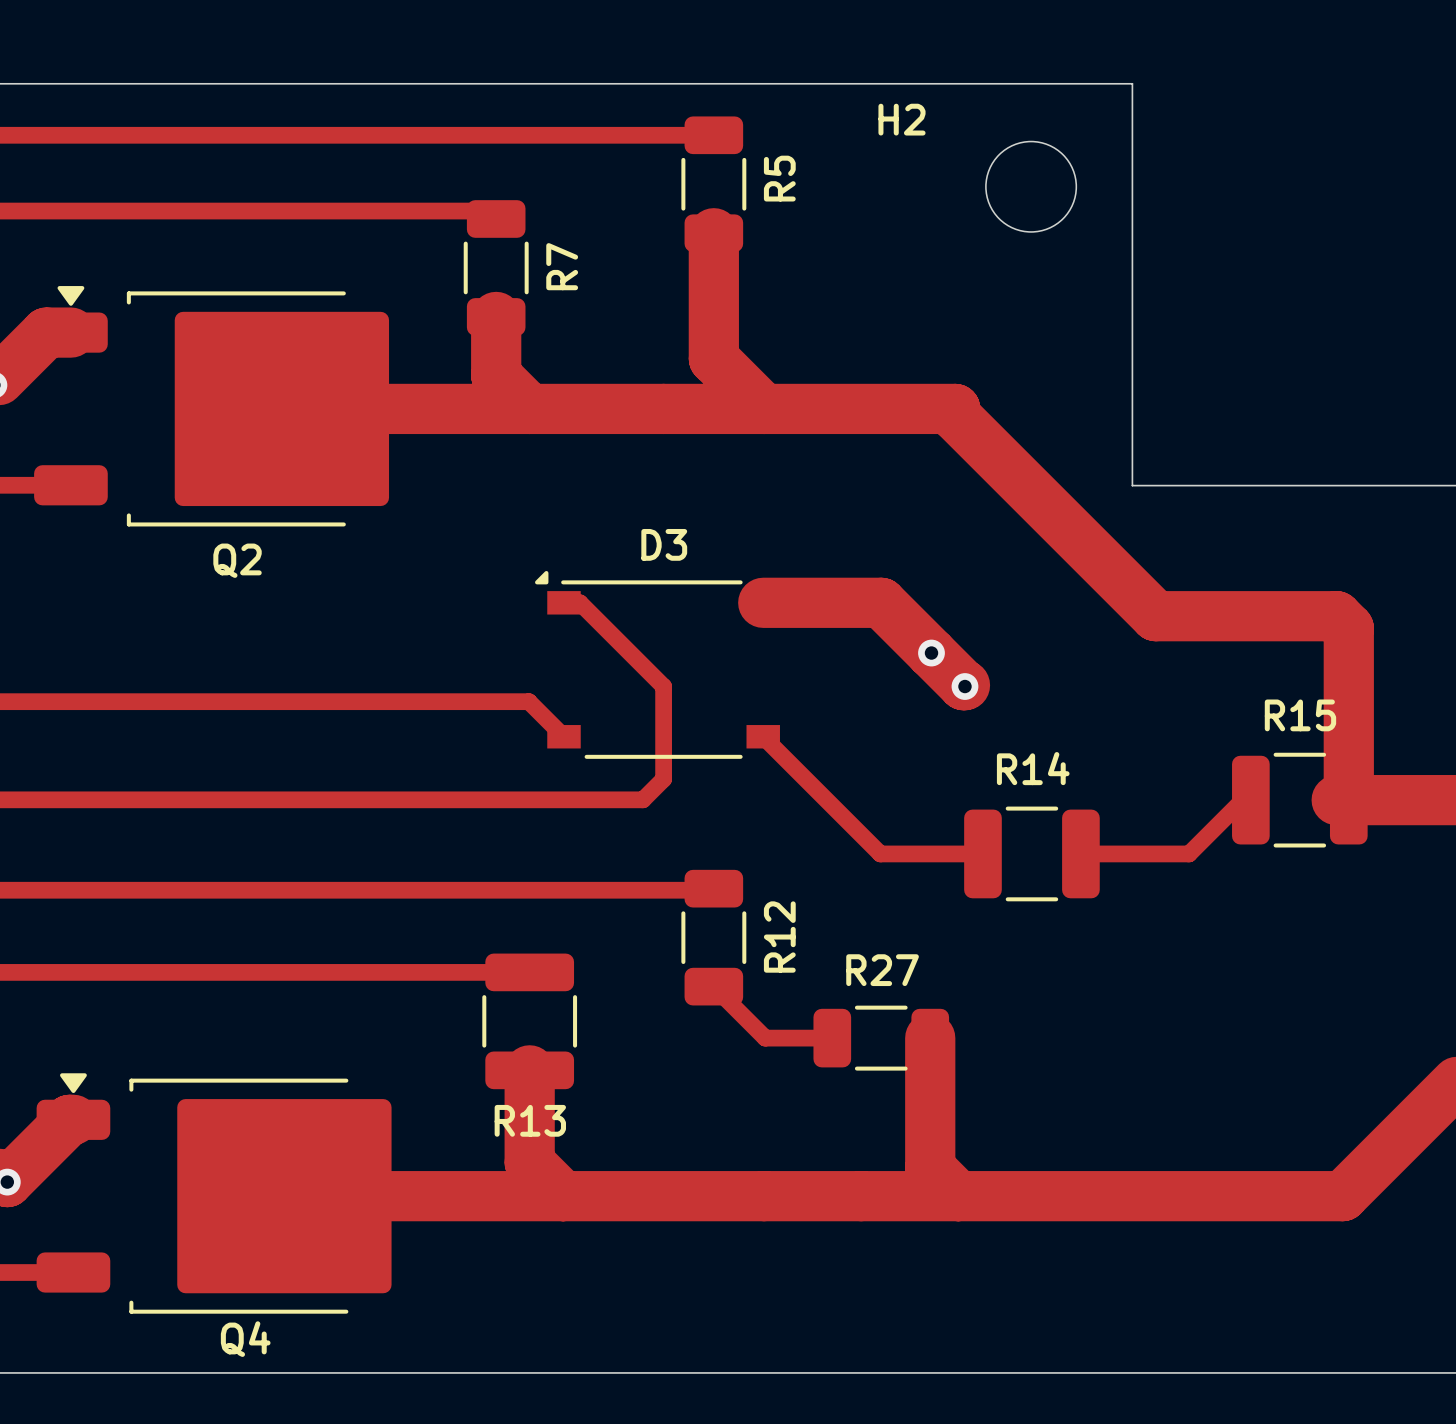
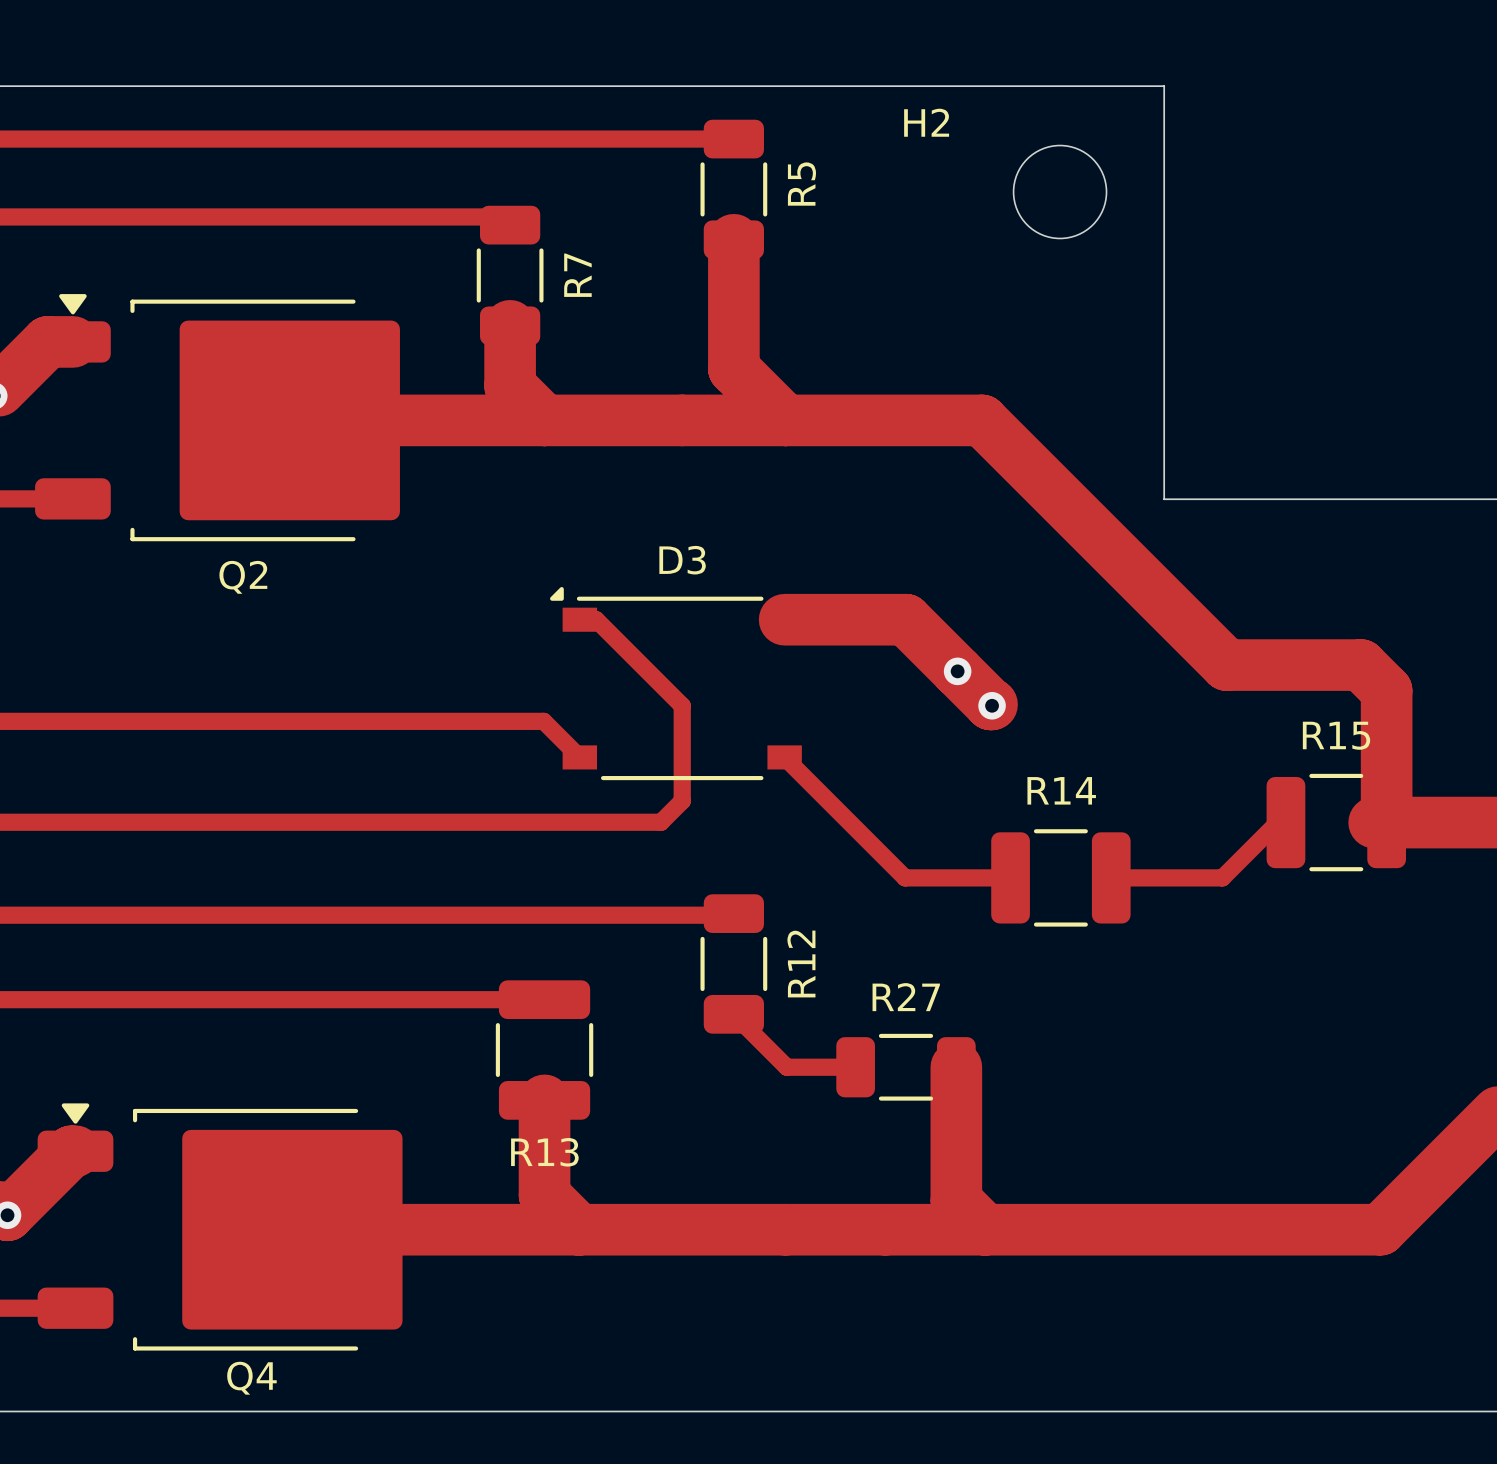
track: (955, 408) (955, 415) (1155, 616) (1336, 616) (1348, 628) (1348, 671) -> (982, 420) (1226, 665) (1361, 665) (1386, 690)

